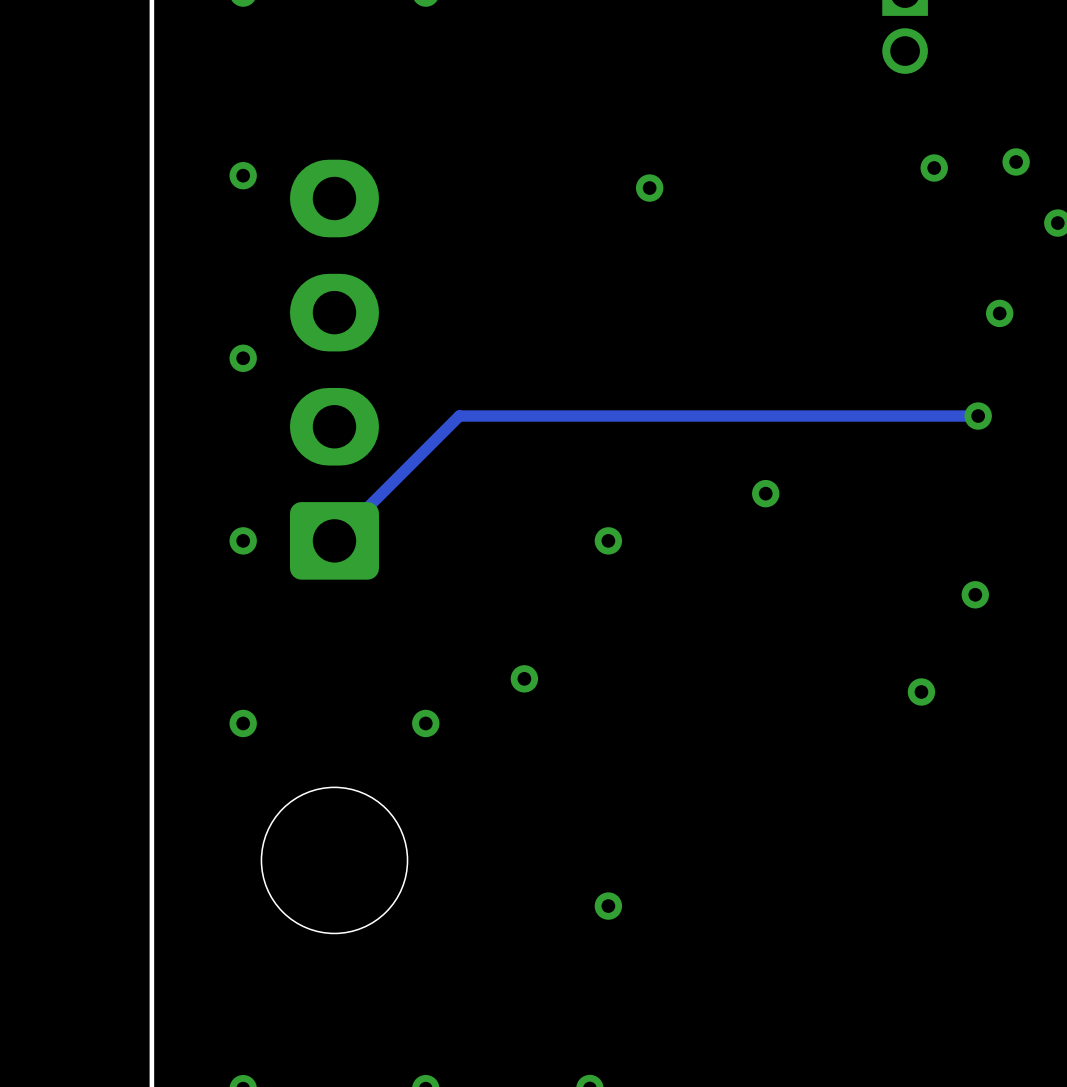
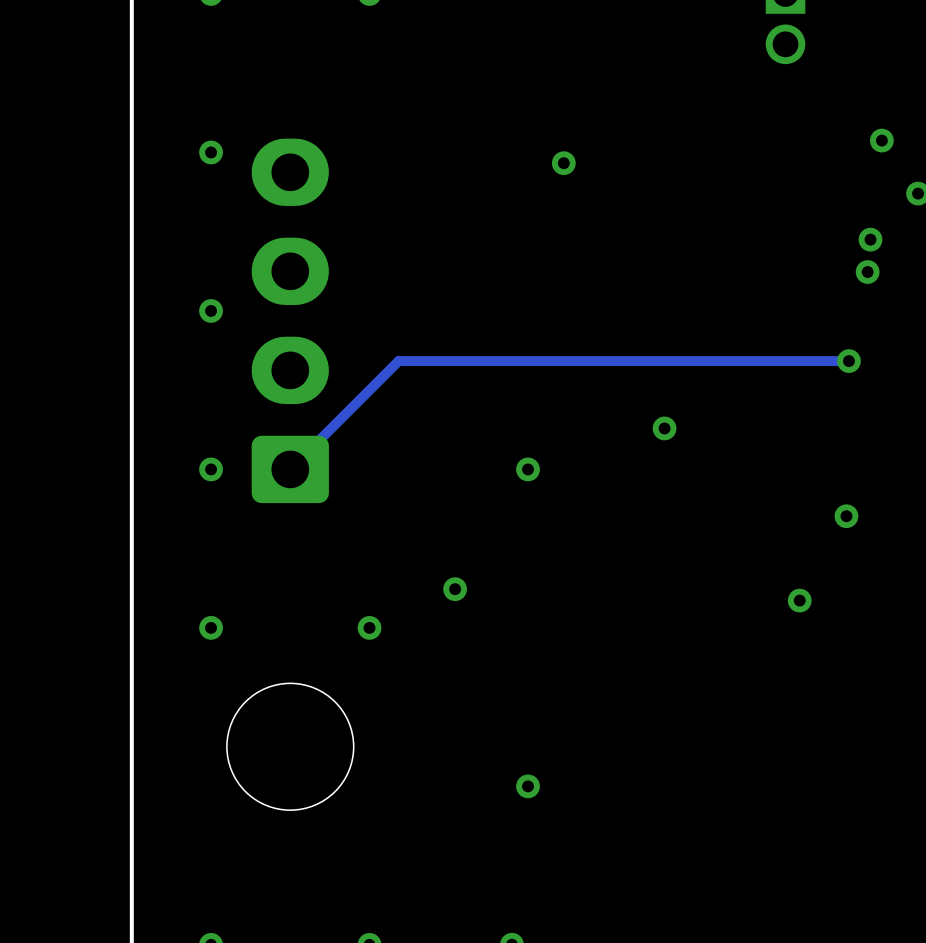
via: (934, 168) -> none
via: none -> (870, 239)

